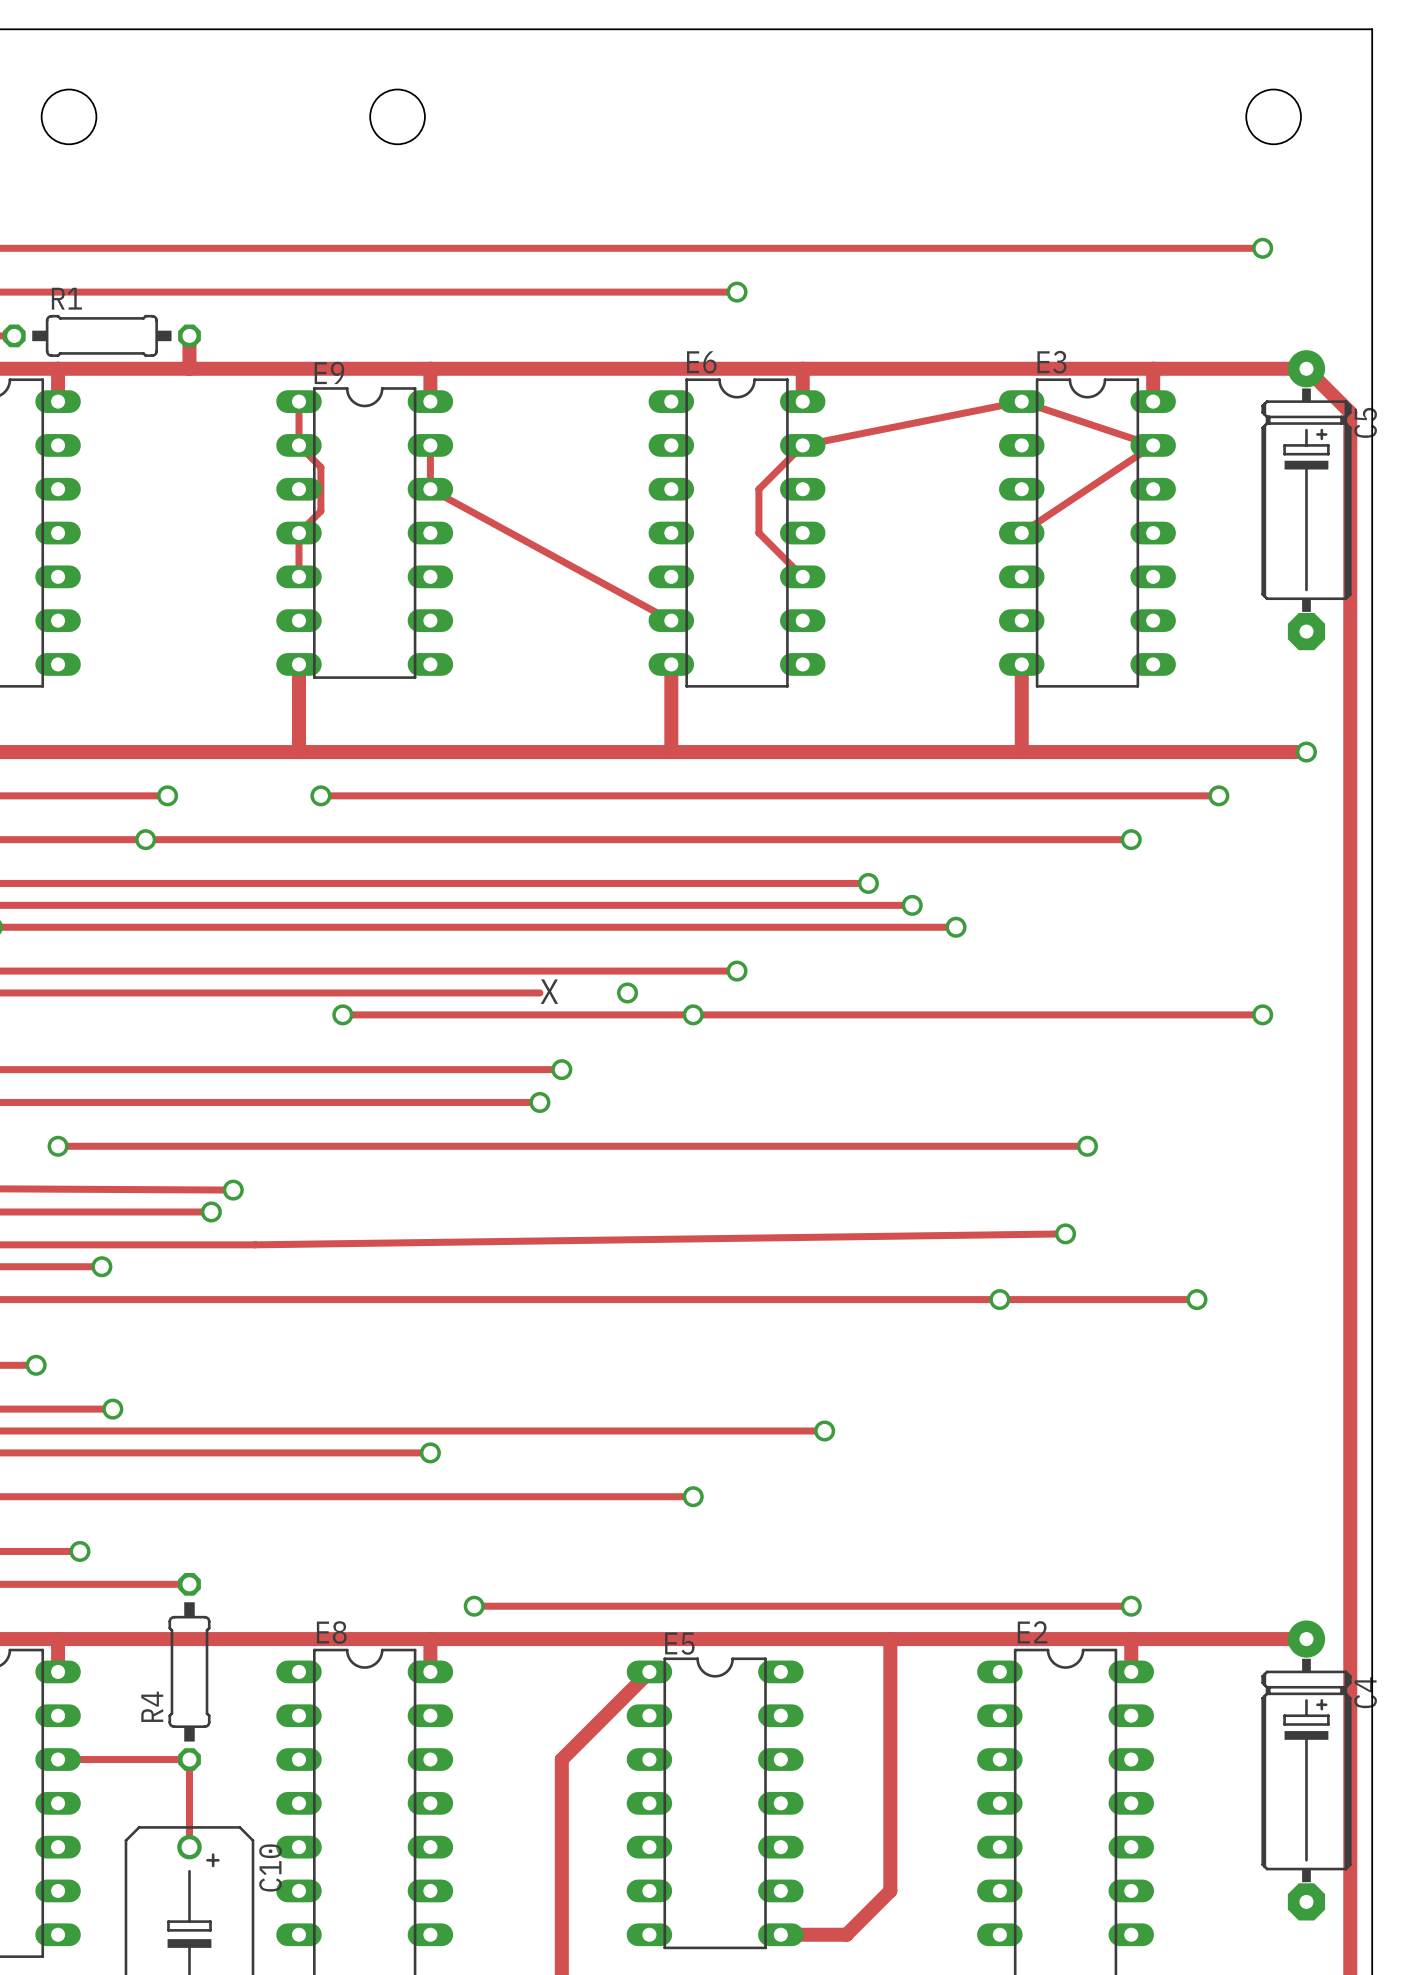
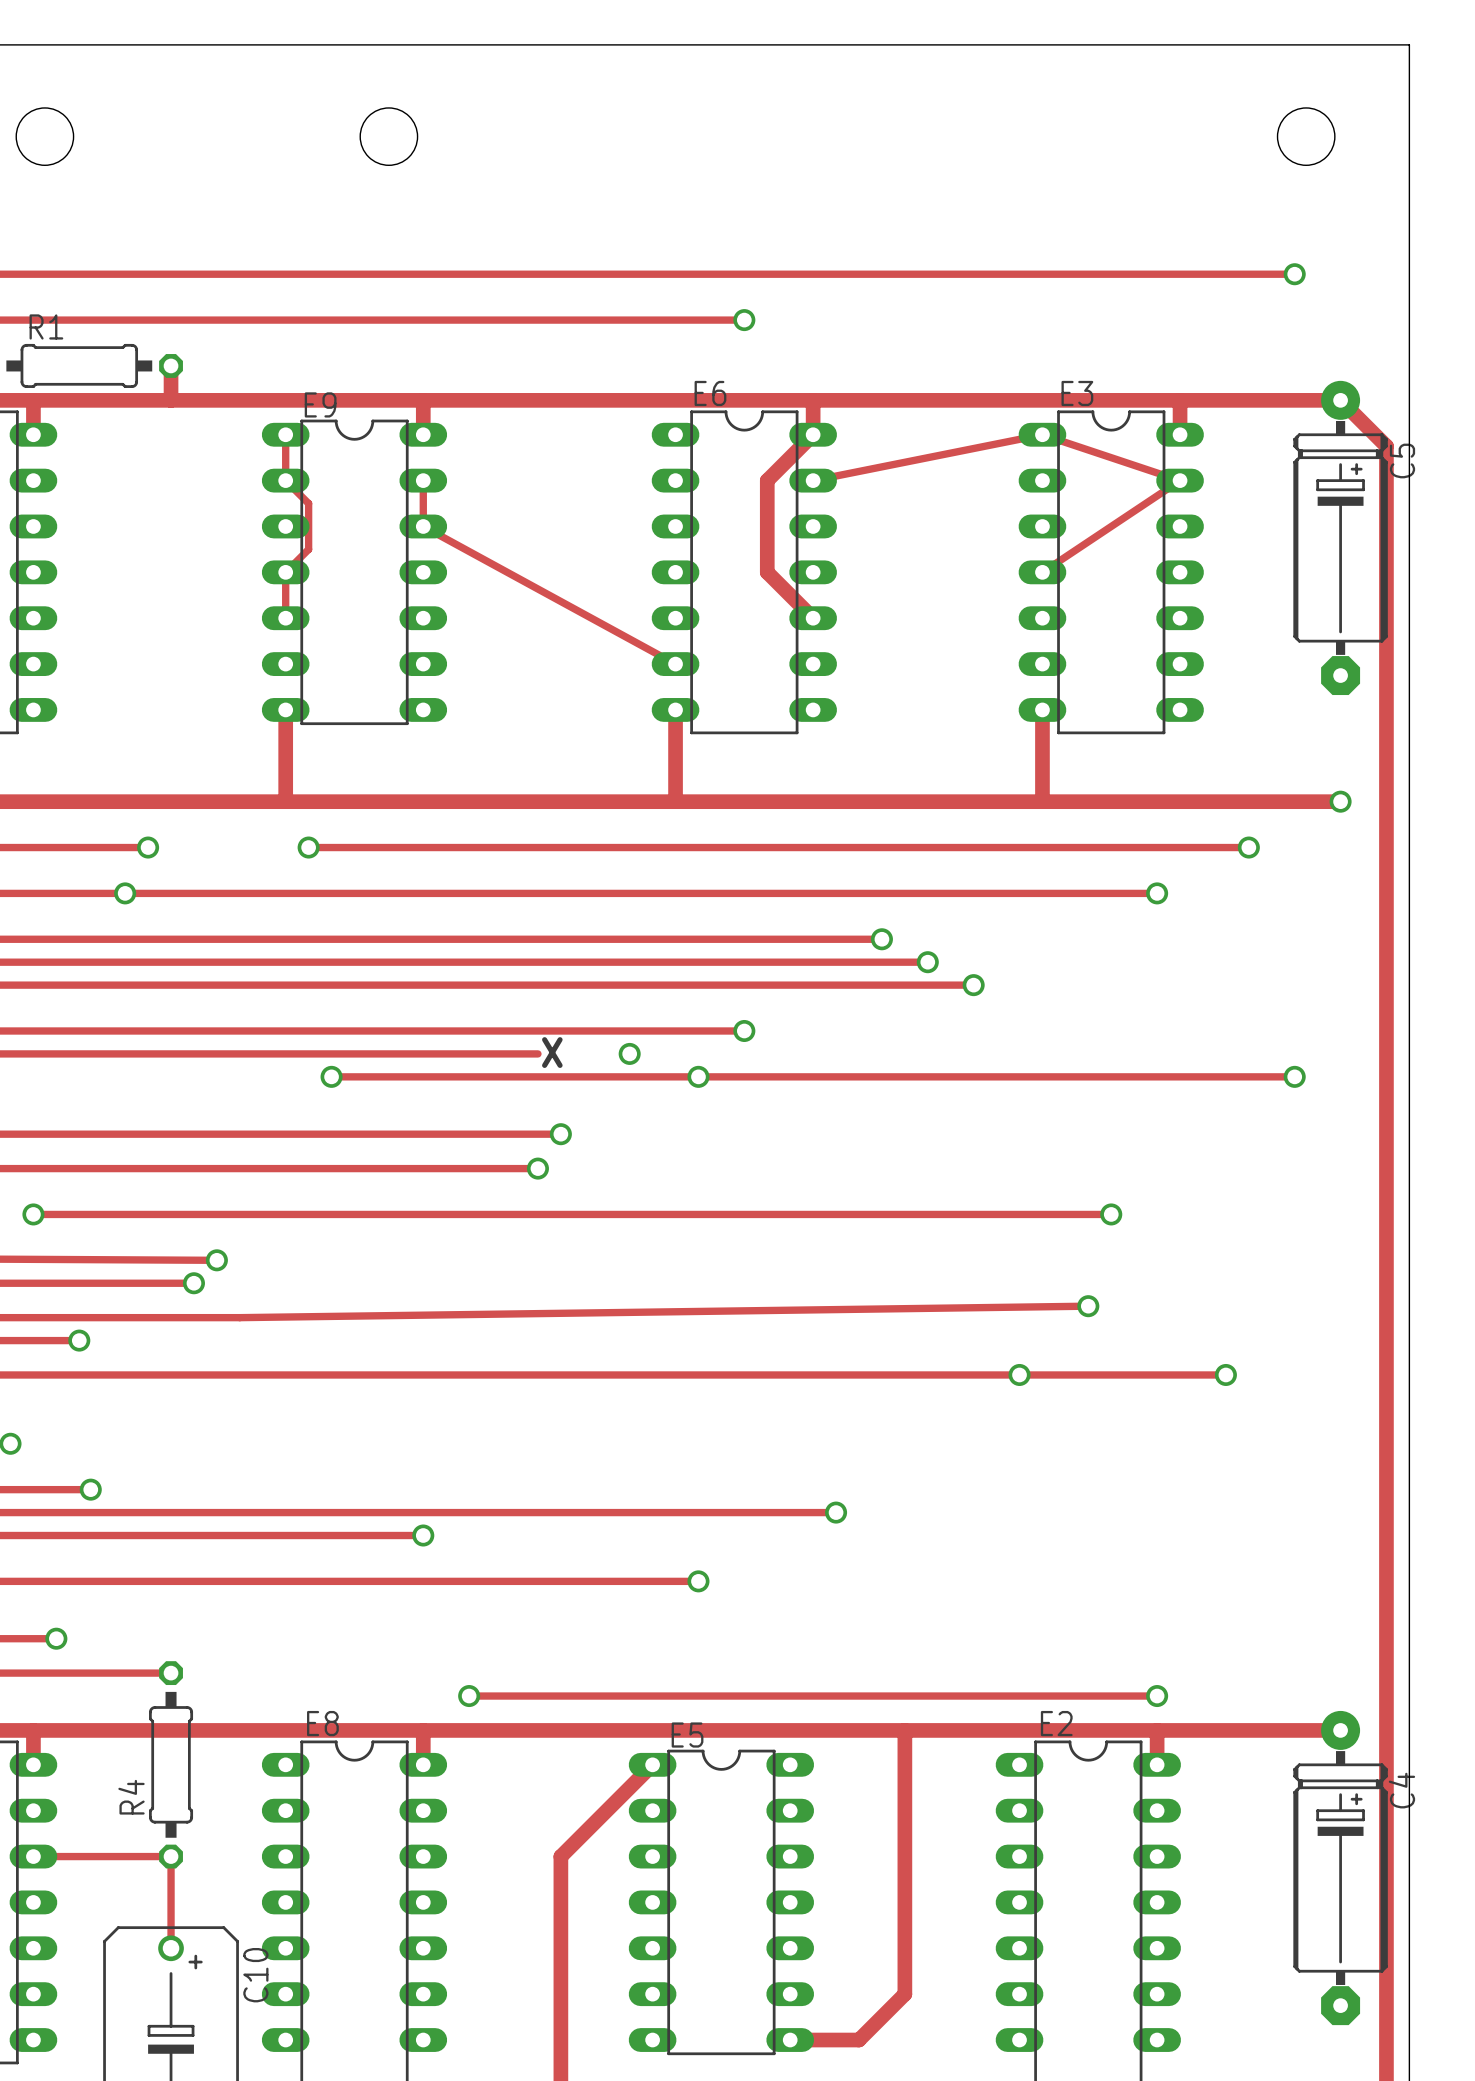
track: (802, 445) (758, 489) -> (813, 434) (767, 480) (767, 526)
track width: thin (758, 489) (758, 533) (802, 576) -> thick (767, 526) (767, 572) (813, 618)

